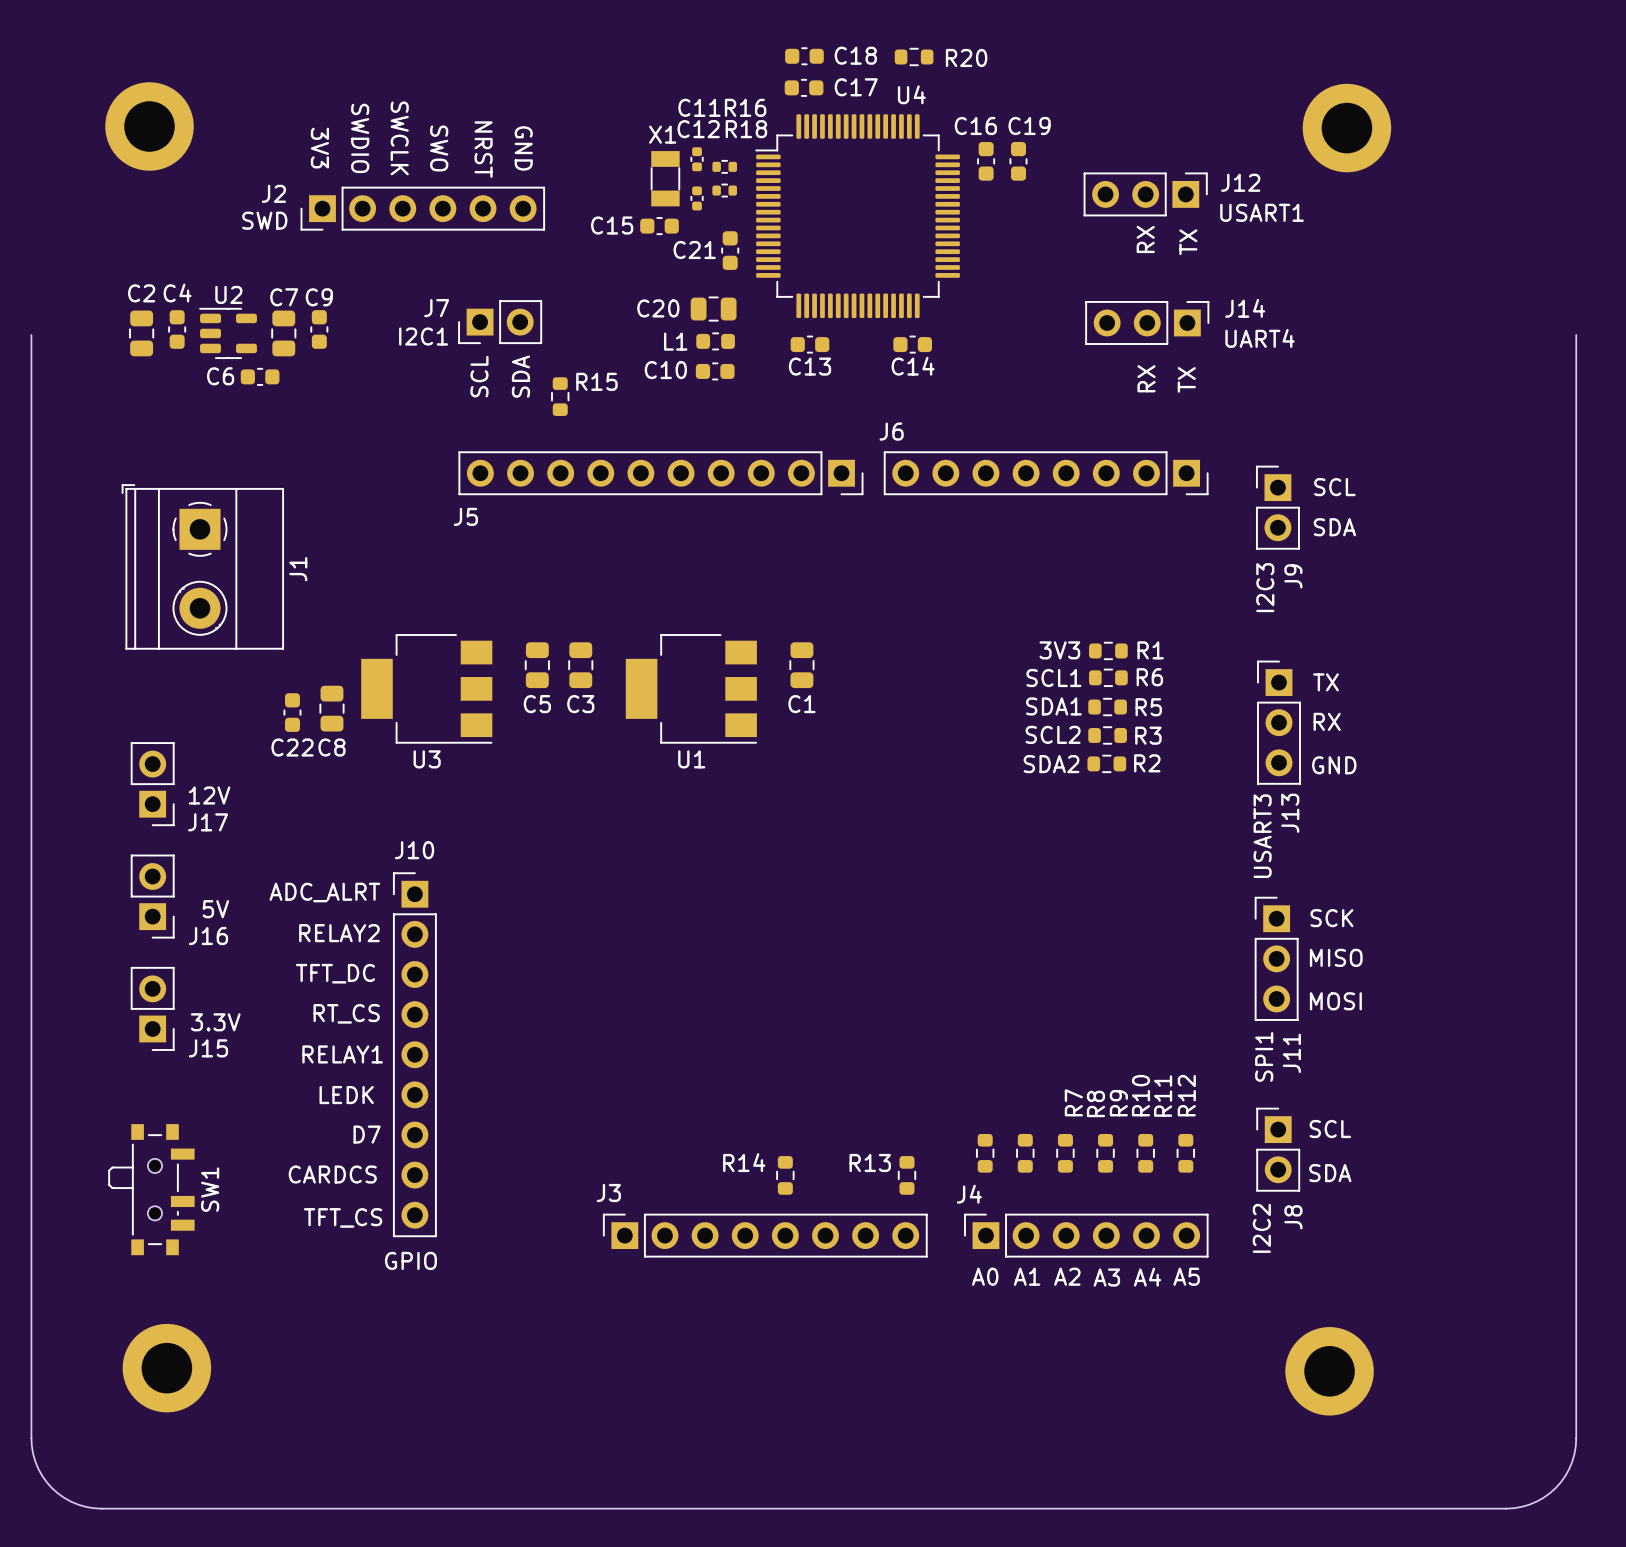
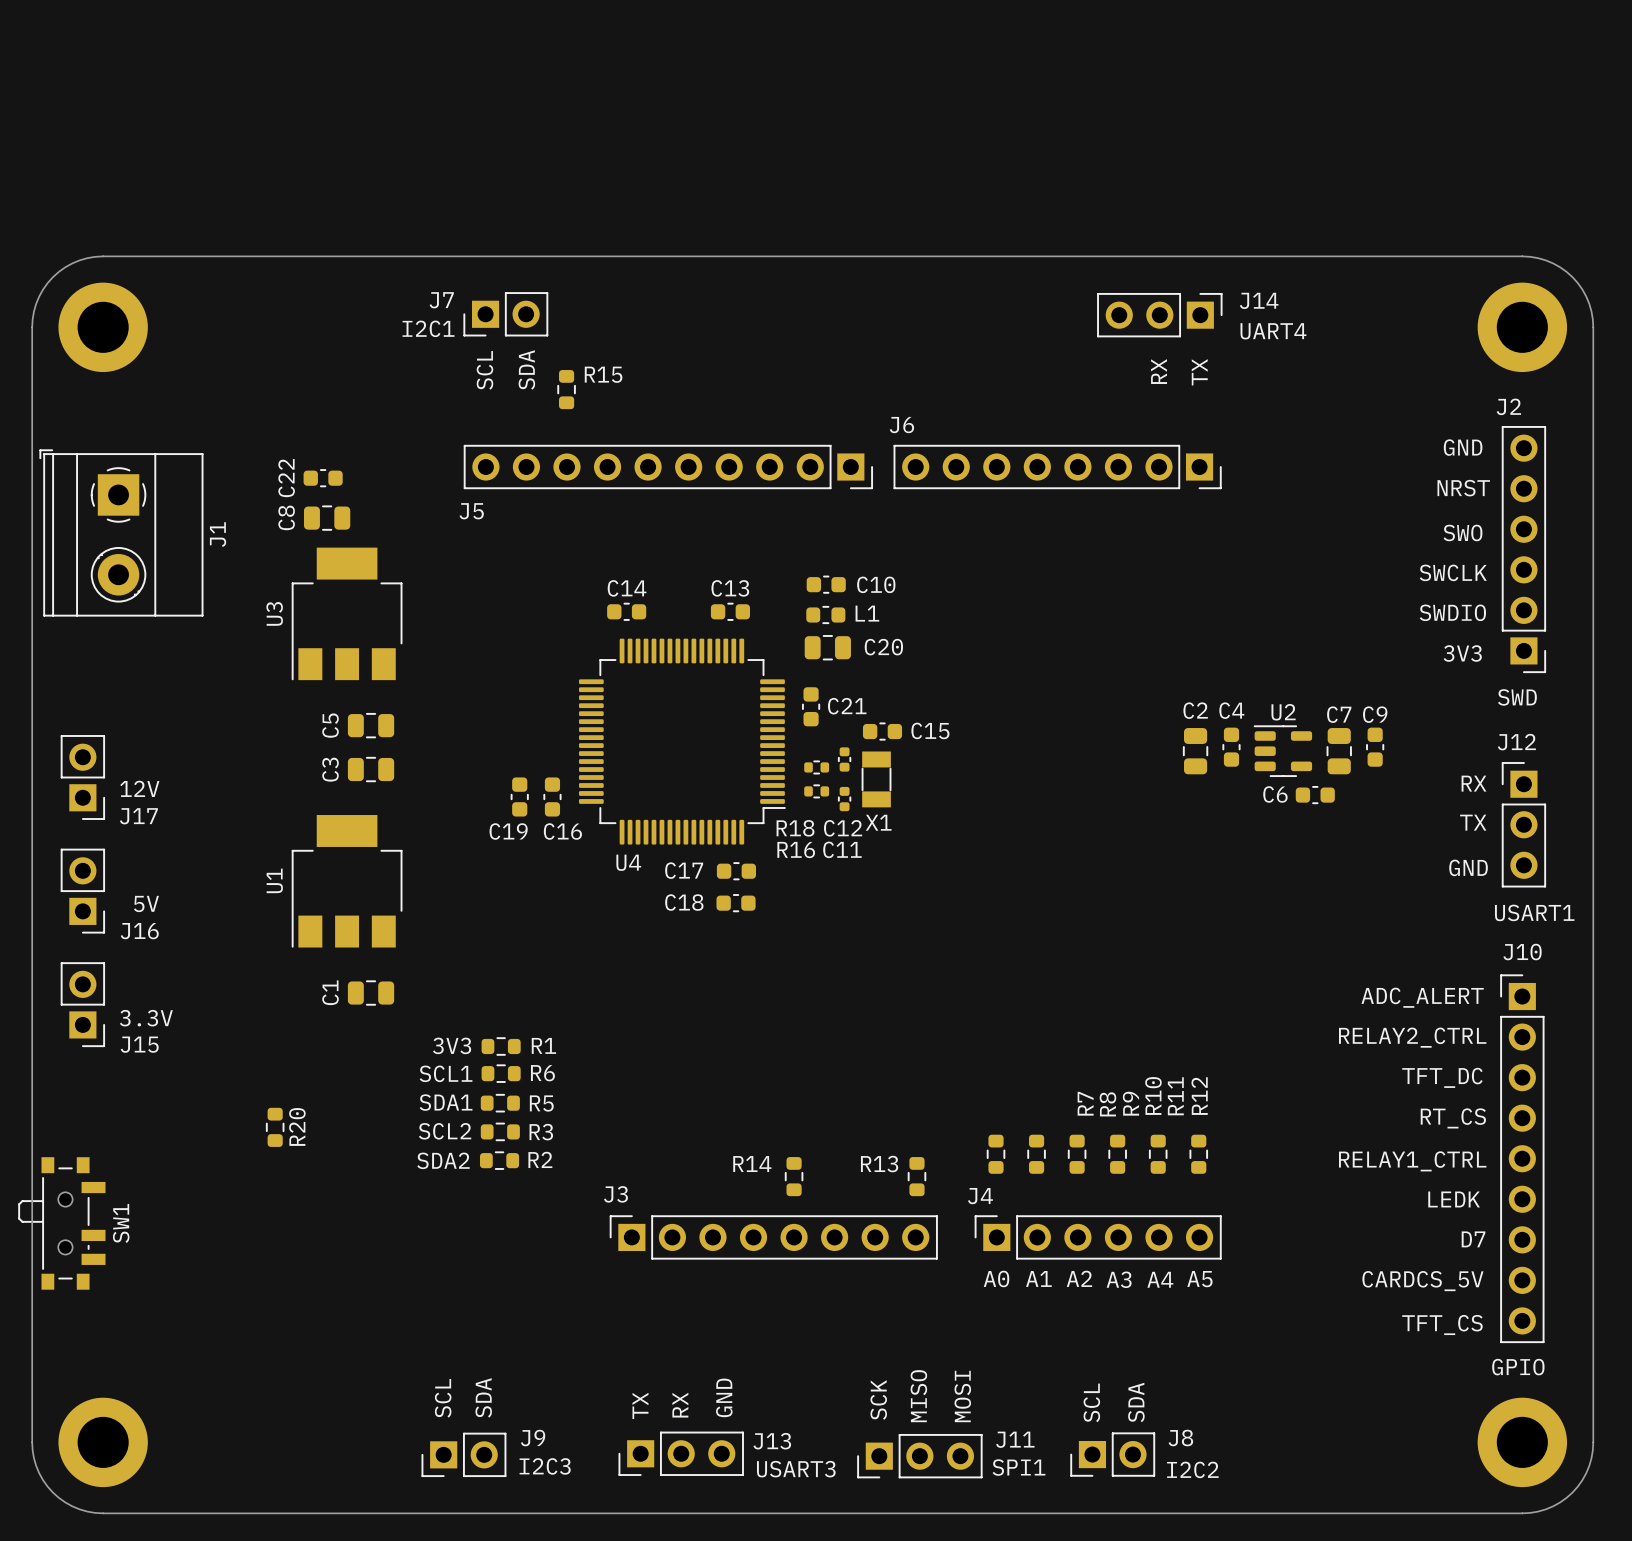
C18 name position: C18 (855, 55) -> C18 (684, 902)
C18 position: (804, 56) -> (736, 903)
R20 rotation: 0° (914, 56) -> 90° clockwise (275, 1127)
R20 position: (914, 56) -> (275, 1127)
C17 position: (804, 87) -> (736, 871)
C17 name position: C17 (856, 87) -> C17 (684, 870)
C11 name position: C11 (699, 107) -> C11 (842, 849)
R16 name position: R16 (745, 107) -> R16 (796, 850)
C16 name position: C16 (975, 125) -> C16 (562, 831)
C19 name position: C19 (1029, 125) -> C19 (508, 831)
part position: (149, 126) -> (103, 327)
part position: (1346, 128) -> (1522, 327)
C12 name position: C12 (698, 129) -> C12 (843, 828)
R18 name position: R18 (746, 129) -> R18 (795, 828)
X1 name position: X1 (662, 134) -> X1 (878, 822)
C11 position: (697, 159) -> (844, 799)
C16 position: (986, 161) -> (552, 796)
C19 position: (1018, 161) -> (519, 796)
R16 position: (724, 166) -> (816, 791)
J12 footprint: [1083, 172, 1208, 217] -> [1501, 762, 1547, 888]
X1 position: (665, 178) -> (876, 779)
J12 name position: J12 (1240, 182) -> J12 (1516, 742)
R18 position: (724, 190) -> (816, 767)
J2 name position: J2 (273, 193) -> J2 (1508, 406)
C12 position: (697, 198) -> (844, 759)
J2 rotation: 0° (422, 208) -> 90° counterclockwise (1523, 549)
J2 position: (422, 208) -> (1523, 549)
J12 value position: USART1 (1262, 212) -> USART1 (1534, 912)
U4 rotation: 0° (857, 216) -> 180° (682, 741)
U4 position: (857, 216) -> (682, 741)
C15 name position: C15 (612, 225) -> C15 (930, 730)
C15 position: (659, 226) -> (882, 731)
C21 name position: C21 (694, 249) -> C21 (847, 706)
C21 position: (730, 250) -> (811, 706)
C20 name position: C20 (658, 308) -> C20 (883, 647)
C20 position: (713, 309) -> (827, 647)
C4 position: (177, 329) -> (1231, 747)
C9 position: (319, 329) -> (1375, 747)
C2 position: (141, 333) -> (1195, 751)
U2 position: (228, 333) -> (1282, 751)
C7 position: (283, 333) -> (1339, 751)
board edge: none -> (32, 327) (33, 311) (39, 296) (52, 277) (72, 263) (87, 258) (103, 256) (1522, 256) (1538, 258) (1553, 263) (1572, 277) (1582, 289) (1589, 303) (1593, 327)
L1 name position: L1 (675, 341) -> L1 (867, 613)
L1 position: (715, 341) -> (825, 615)
C13 position: (809, 344) -> (730, 611)
C14 position: (912, 344) -> (626, 611)
C13 name position: C13 (809, 366) -> C13 (730, 588)
C14 name position: C14 (913, 366) -> C14 (627, 588)
C10 name position: C10 (665, 370) -> C10 (876, 584)
C10 position: (715, 371) -> (826, 584)
C6 position: (260, 376) -> (1315, 795)
J9 rotation: 0° (1277, 507) -> 90° counterclockwise (463, 1454)
J9 position: (1277, 507) -> (463, 1454)
J1 position: (202, 566) -> (121, 532)
R1 position: (1108, 650) -> (501, 1046)
C5 rotation: 0° (537, 665) -> 90° clockwise (371, 725)
C5 position: (537, 665) -> (371, 725)
C3 rotation: 0° (580, 665) -> 90° clockwise (371, 769)
C3 position: (580, 665) -> (371, 769)
C1 rotation: 0° (801, 665) -> 90° clockwise (371, 993)
C1 position: (801, 665) -> (371, 993)
R6 position: (1108, 677) -> (501, 1073)
U3 rotation: 0° (426, 688) -> 90° clockwise (347, 613)
U3 position: (426, 688) -> (347, 613)
U1 rotation: 0° (691, 688) -> 90° clockwise (347, 881)
U1 position: (691, 688) -> (347, 881)
R5 position: (1107, 707) -> (500, 1103)
C8 rotation: 0° (331, 708) -> 90° clockwise (327, 518)
C8 position: (331, 708) -> (327, 518)
C22 rotation: 0° (292, 712) -> 90° clockwise (323, 478)
C22 position: (292, 712) -> (323, 478)
J13 rotation: 0° (1279, 722) -> 90° counterclockwise (681, 1453)
J13 position: (1279, 722) -> (681, 1453)
R3 position: (1107, 735) -> (500, 1131)
R2 position: (1106, 763) -> (499, 1160)
J17 position: (152, 784) -> (82, 777)
J10 footprint: [392, 872, 437, 1238] -> [1500, 974, 1545, 1344]
J16 position: (152, 896) -> (82, 891)
J11 rotation: 0° (1276, 958) -> 90° counterclockwise (919, 1456)
J11 position: (1276, 958) -> (919, 1456)
J15 position: (152, 1008) -> (82, 1004)
J8 rotation: 0° (1278, 1149) -> 90° counterclockwise (1112, 1454)
J8 position: (1278, 1149) -> (1112, 1454)
SW1 position: (151, 1189) -> (61, 1223)
part position: (166, 1368) -> (103, 1442)
part position: (1329, 1371) -> (1522, 1442)

